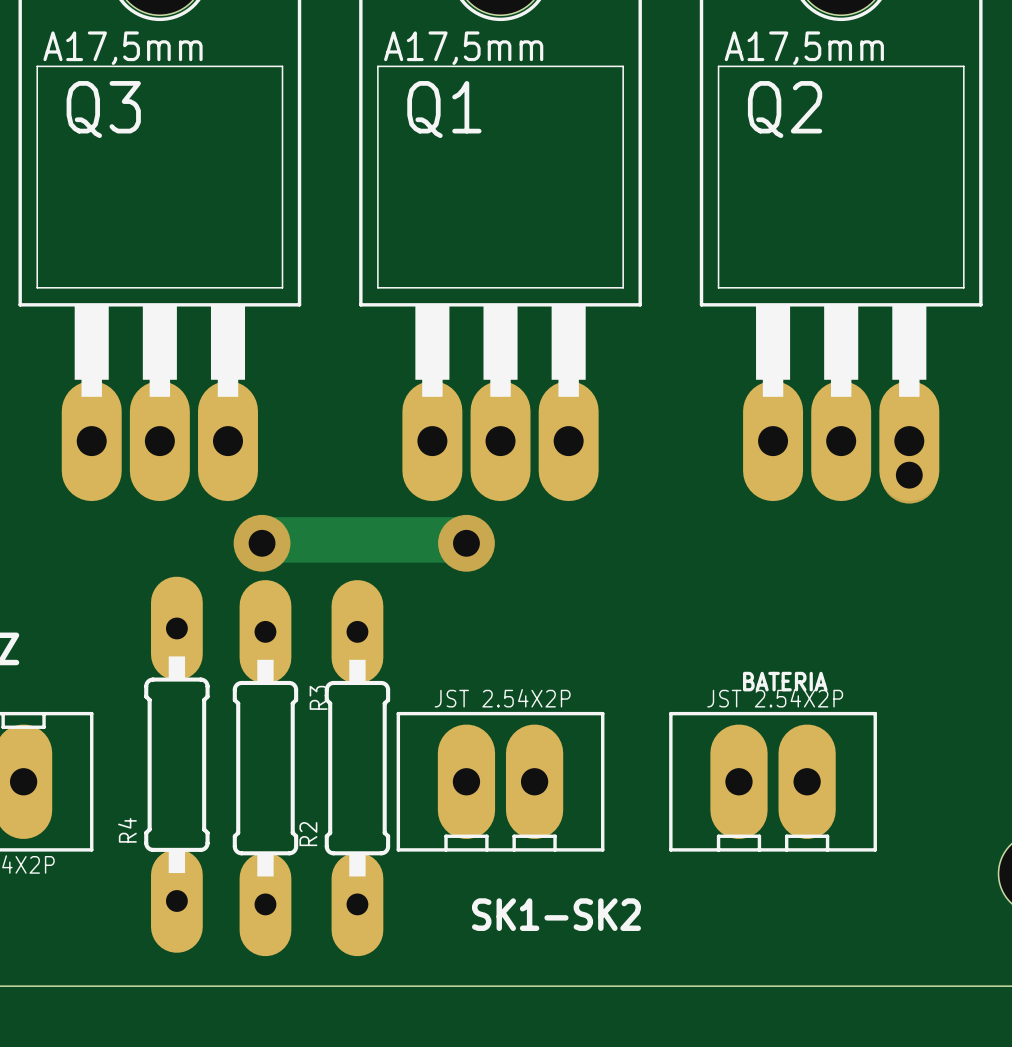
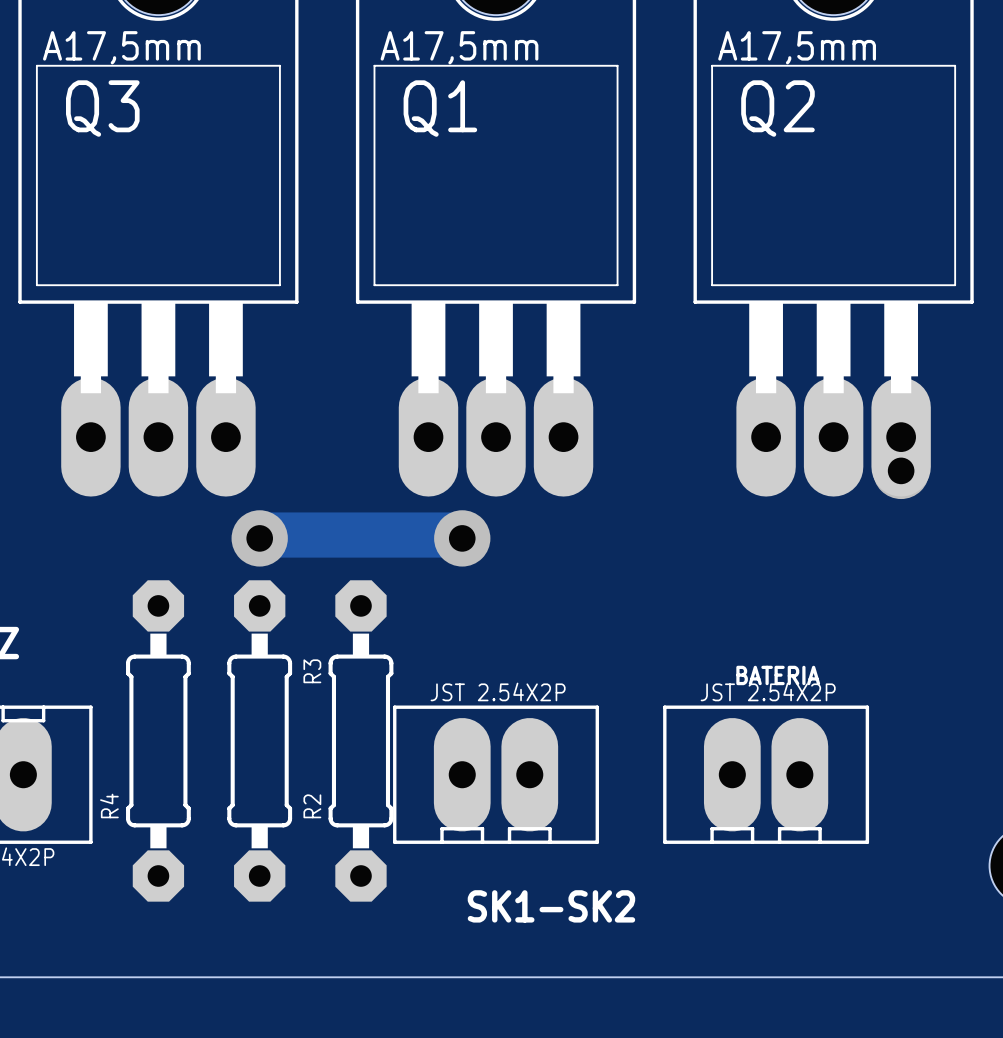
R4 footprint: [144, 576, 210, 953] -> [126, 580, 191, 902]
R3 footprint: [232, 580, 299, 957] -> [227, 580, 293, 902]
R2 footprint: [324, 580, 391, 957] -> [328, 580, 394, 902]

